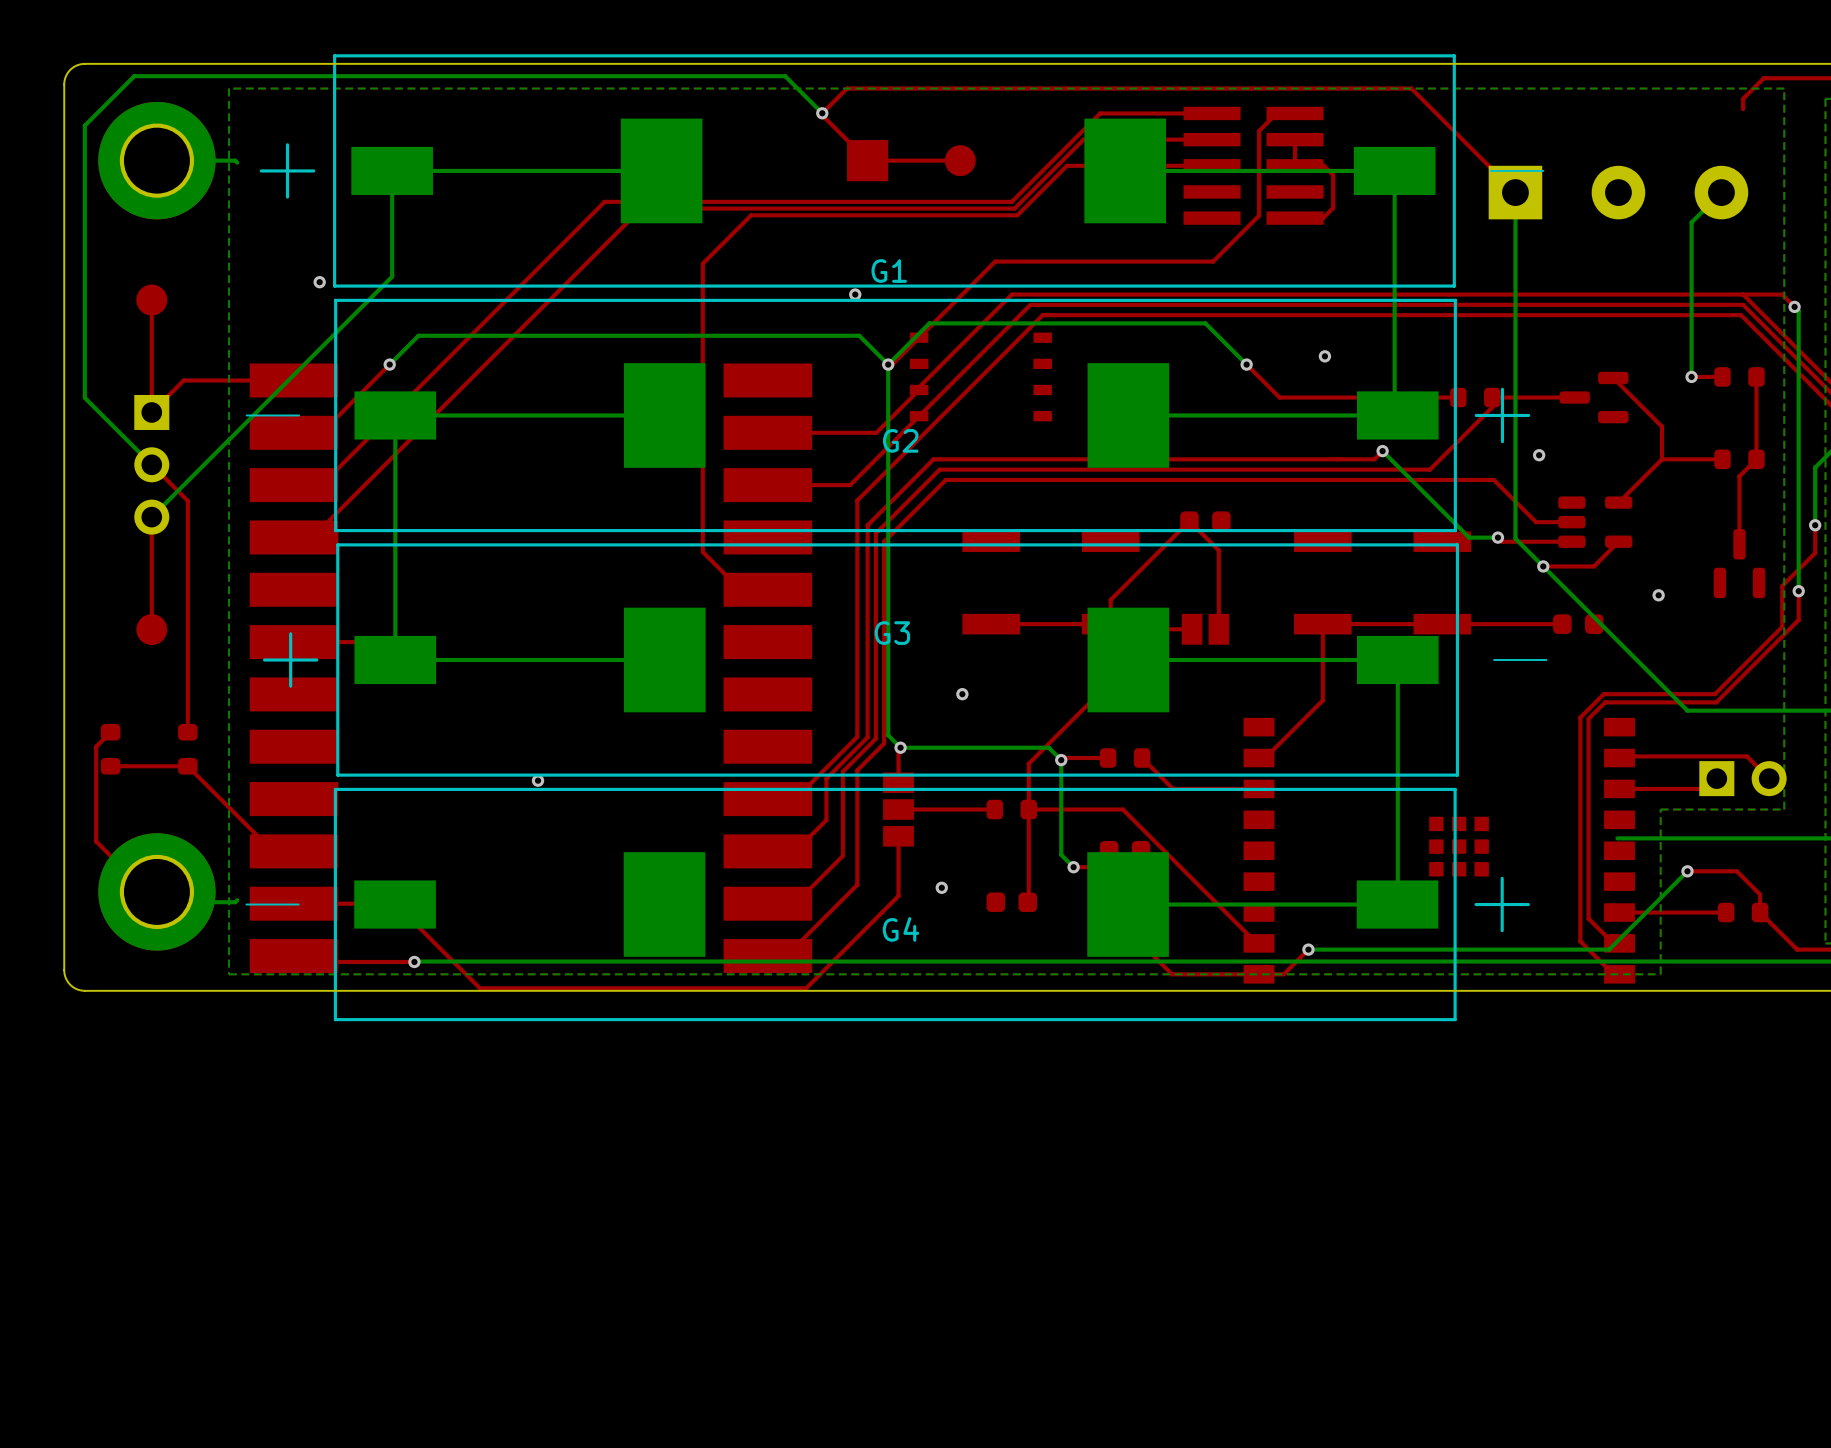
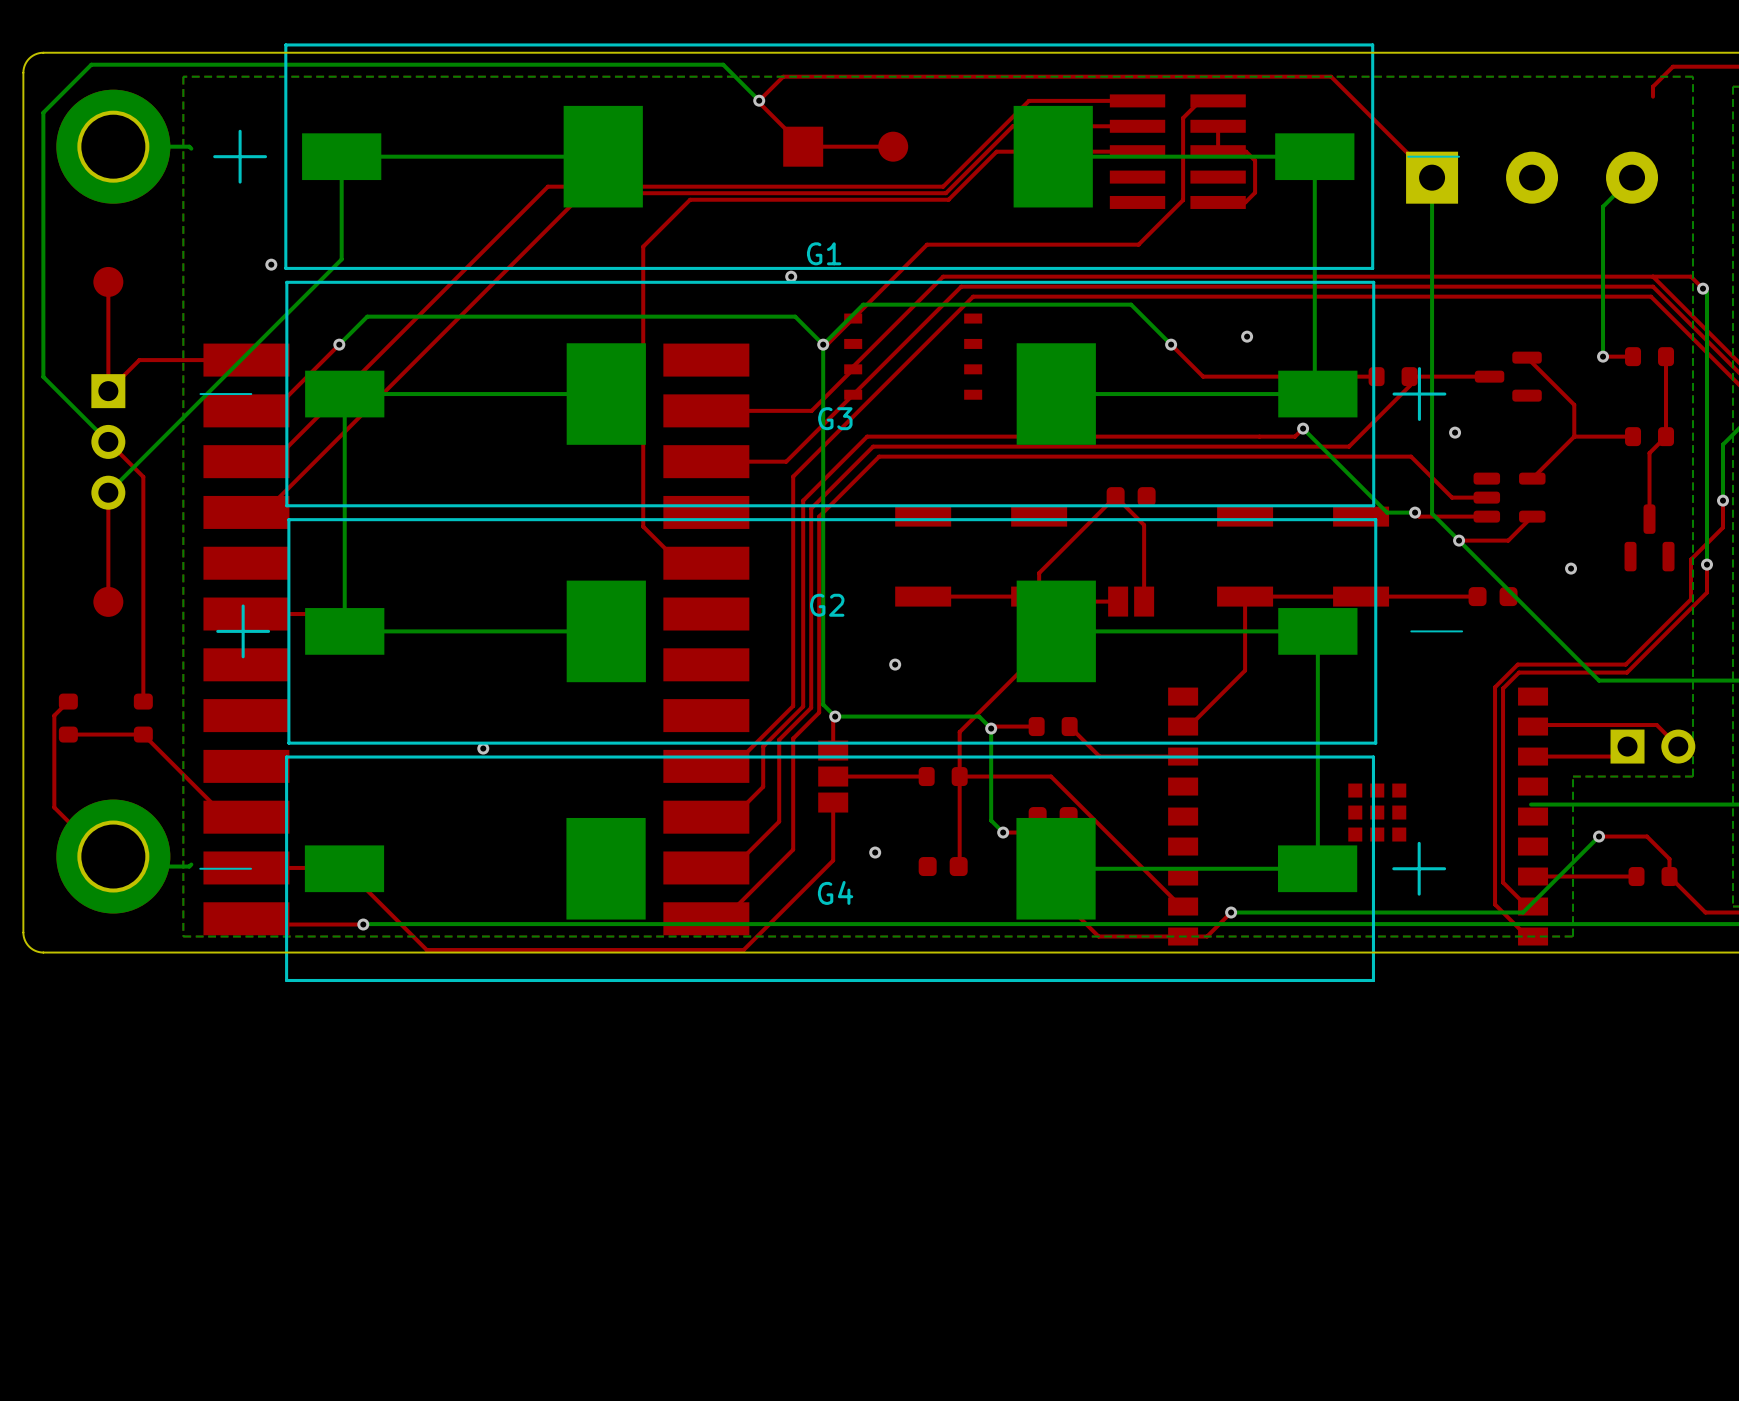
G2 name: G2 (900, 440) -> G3 (835, 418)
G3 name: G3 (892, 633) -> G2 (827, 605)

